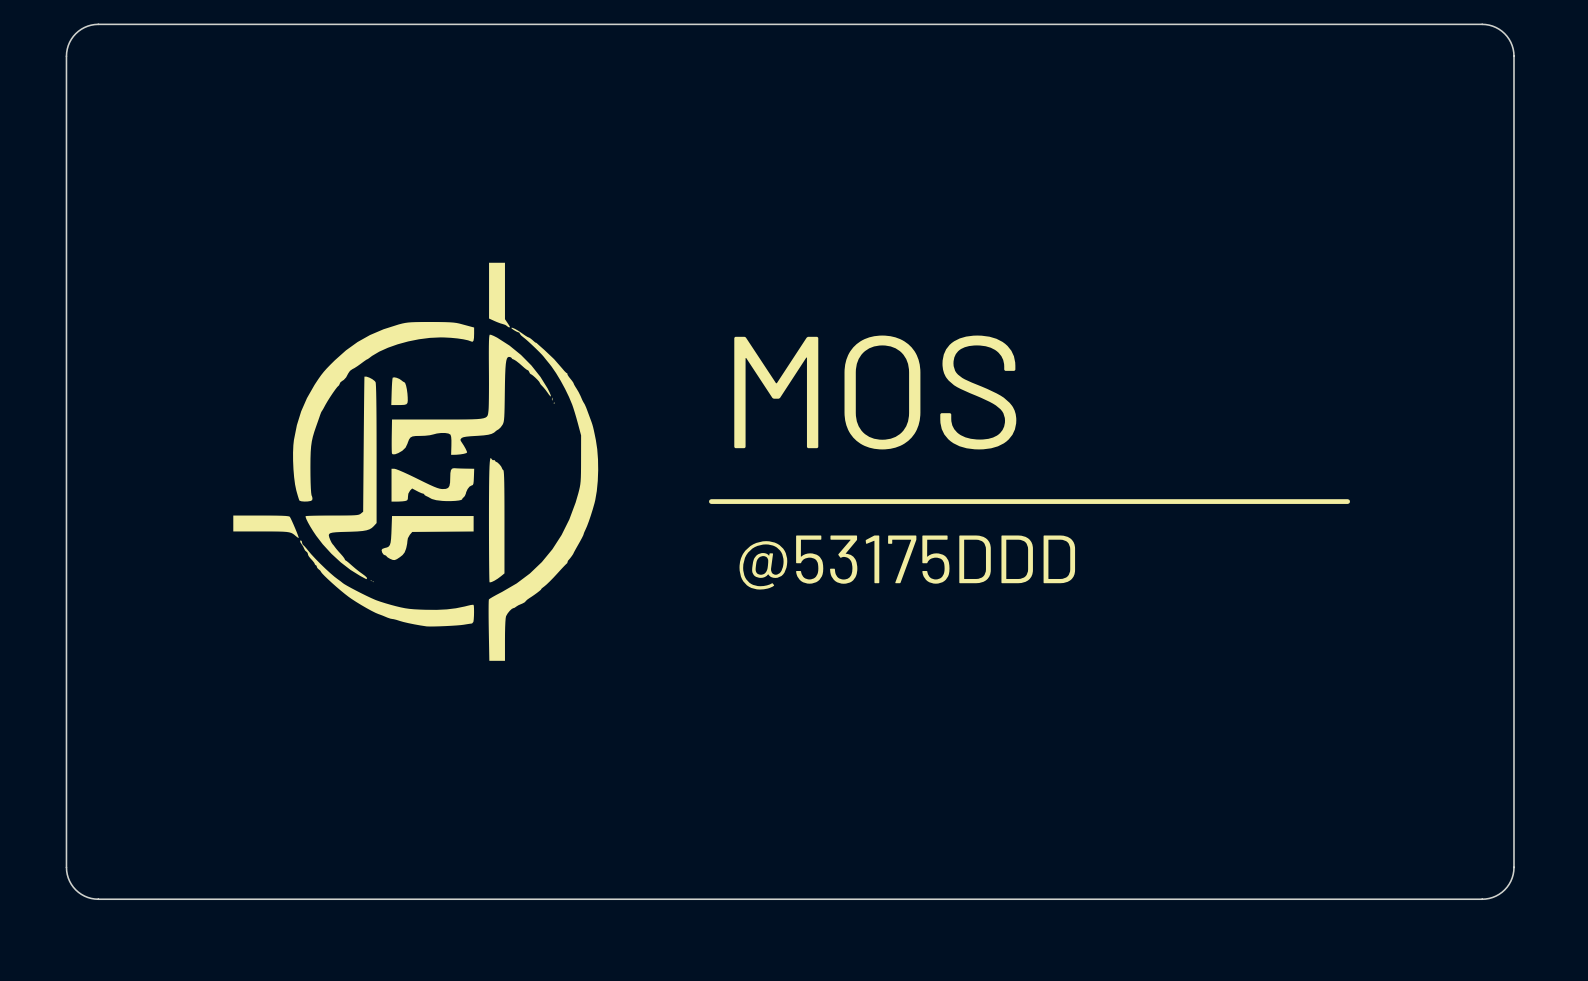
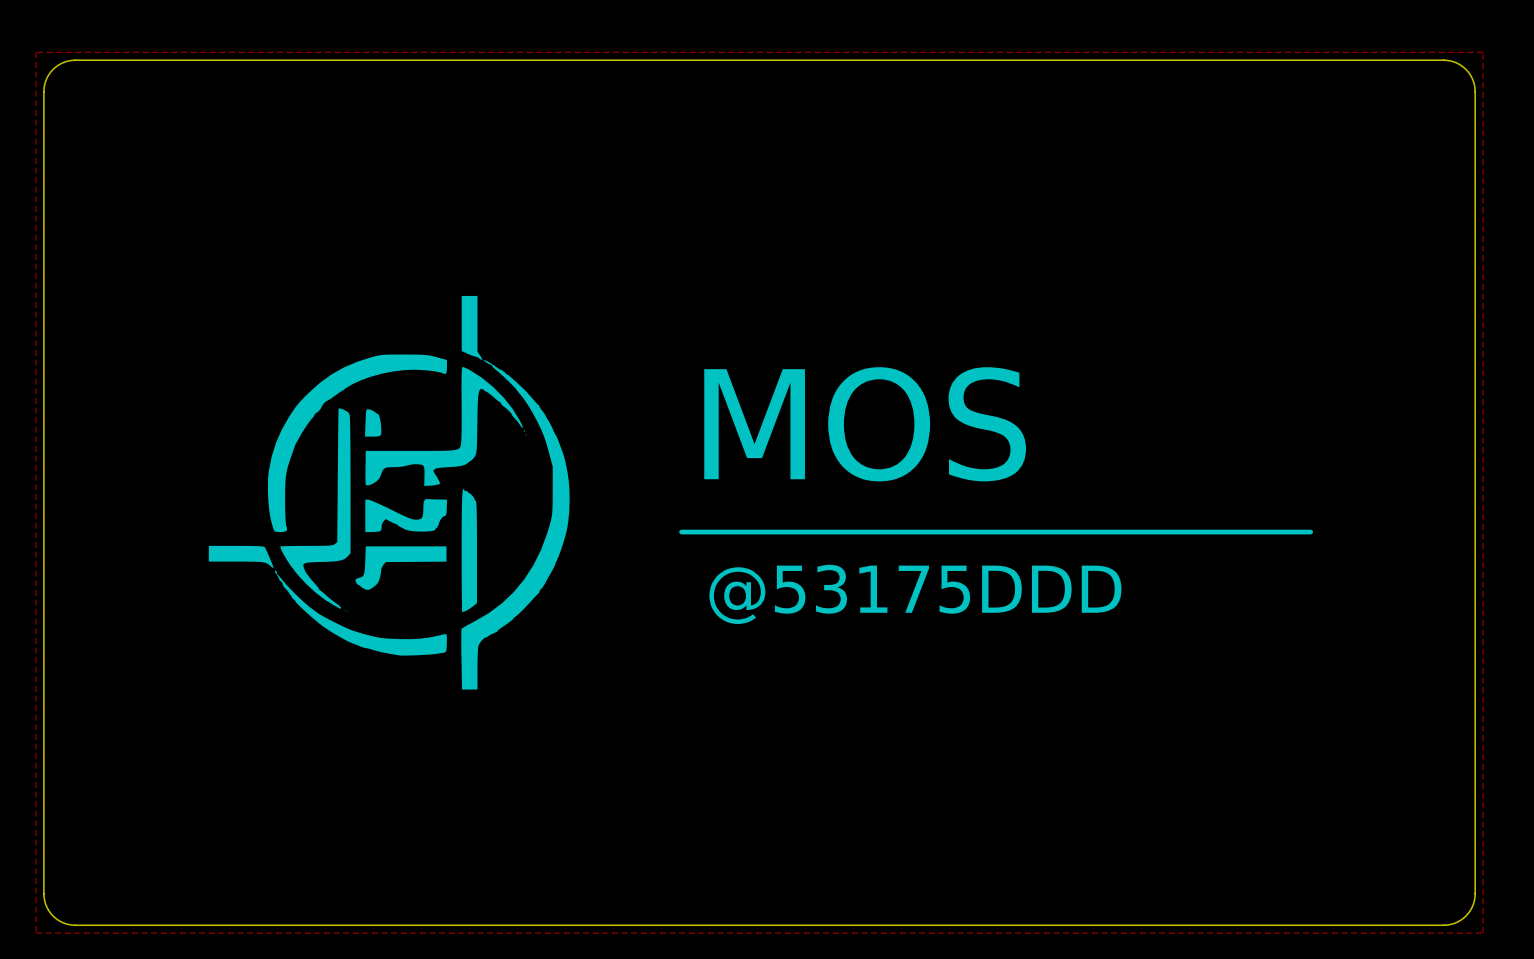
top zone outline: none -> (36, 52) (1483, 52) (1483, 933) (36, 933) (36, 52)

